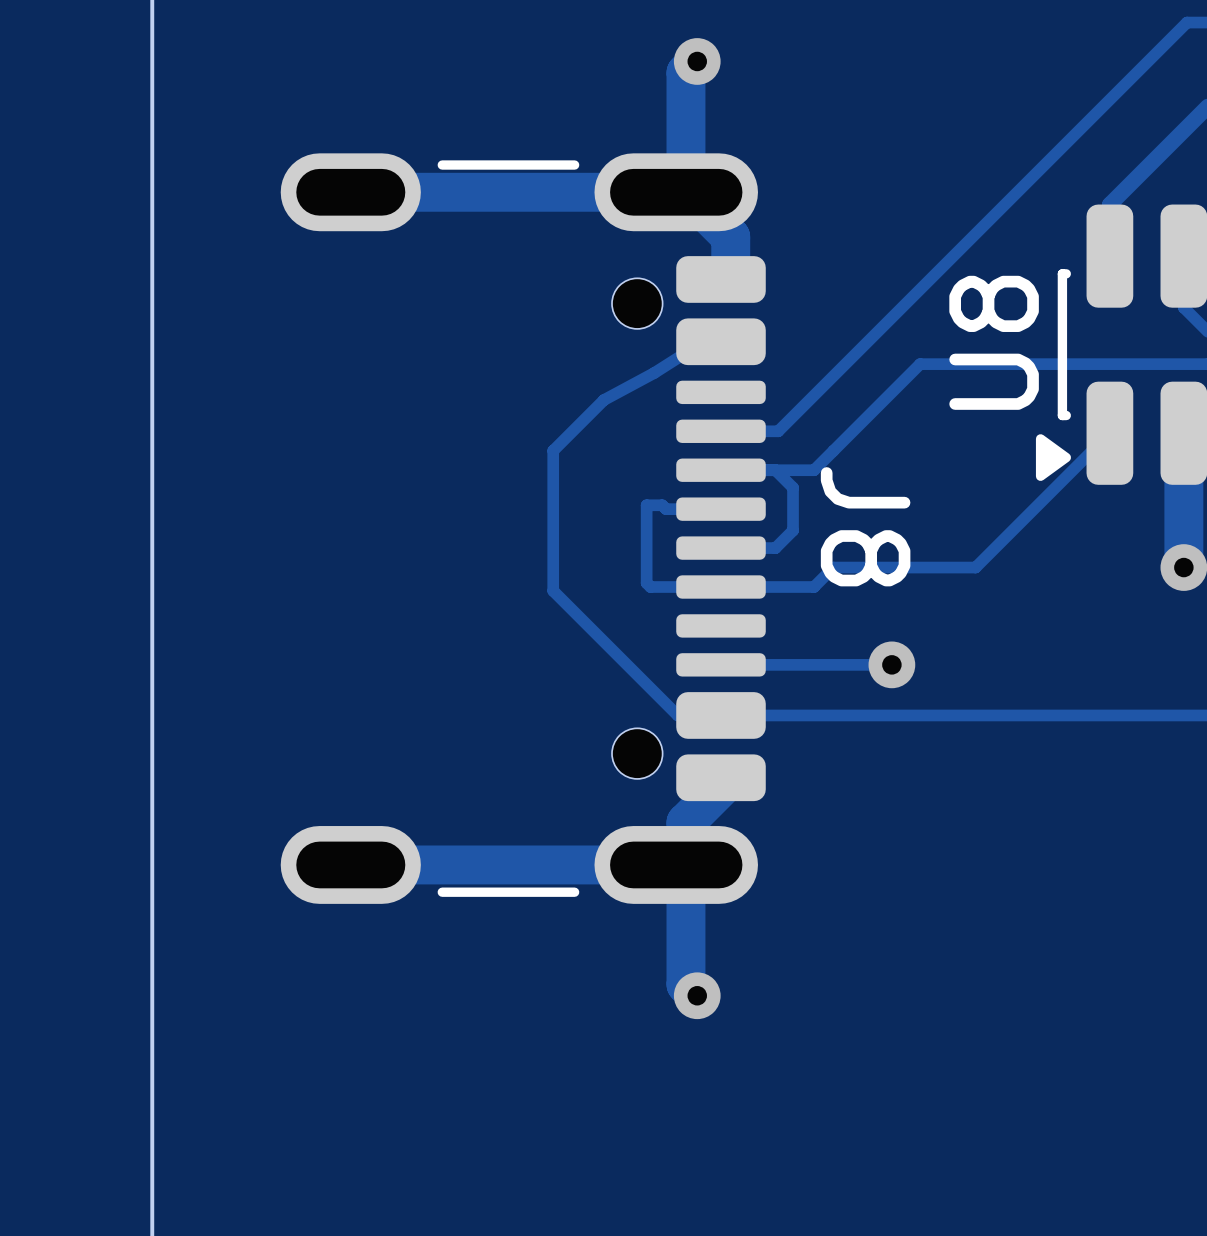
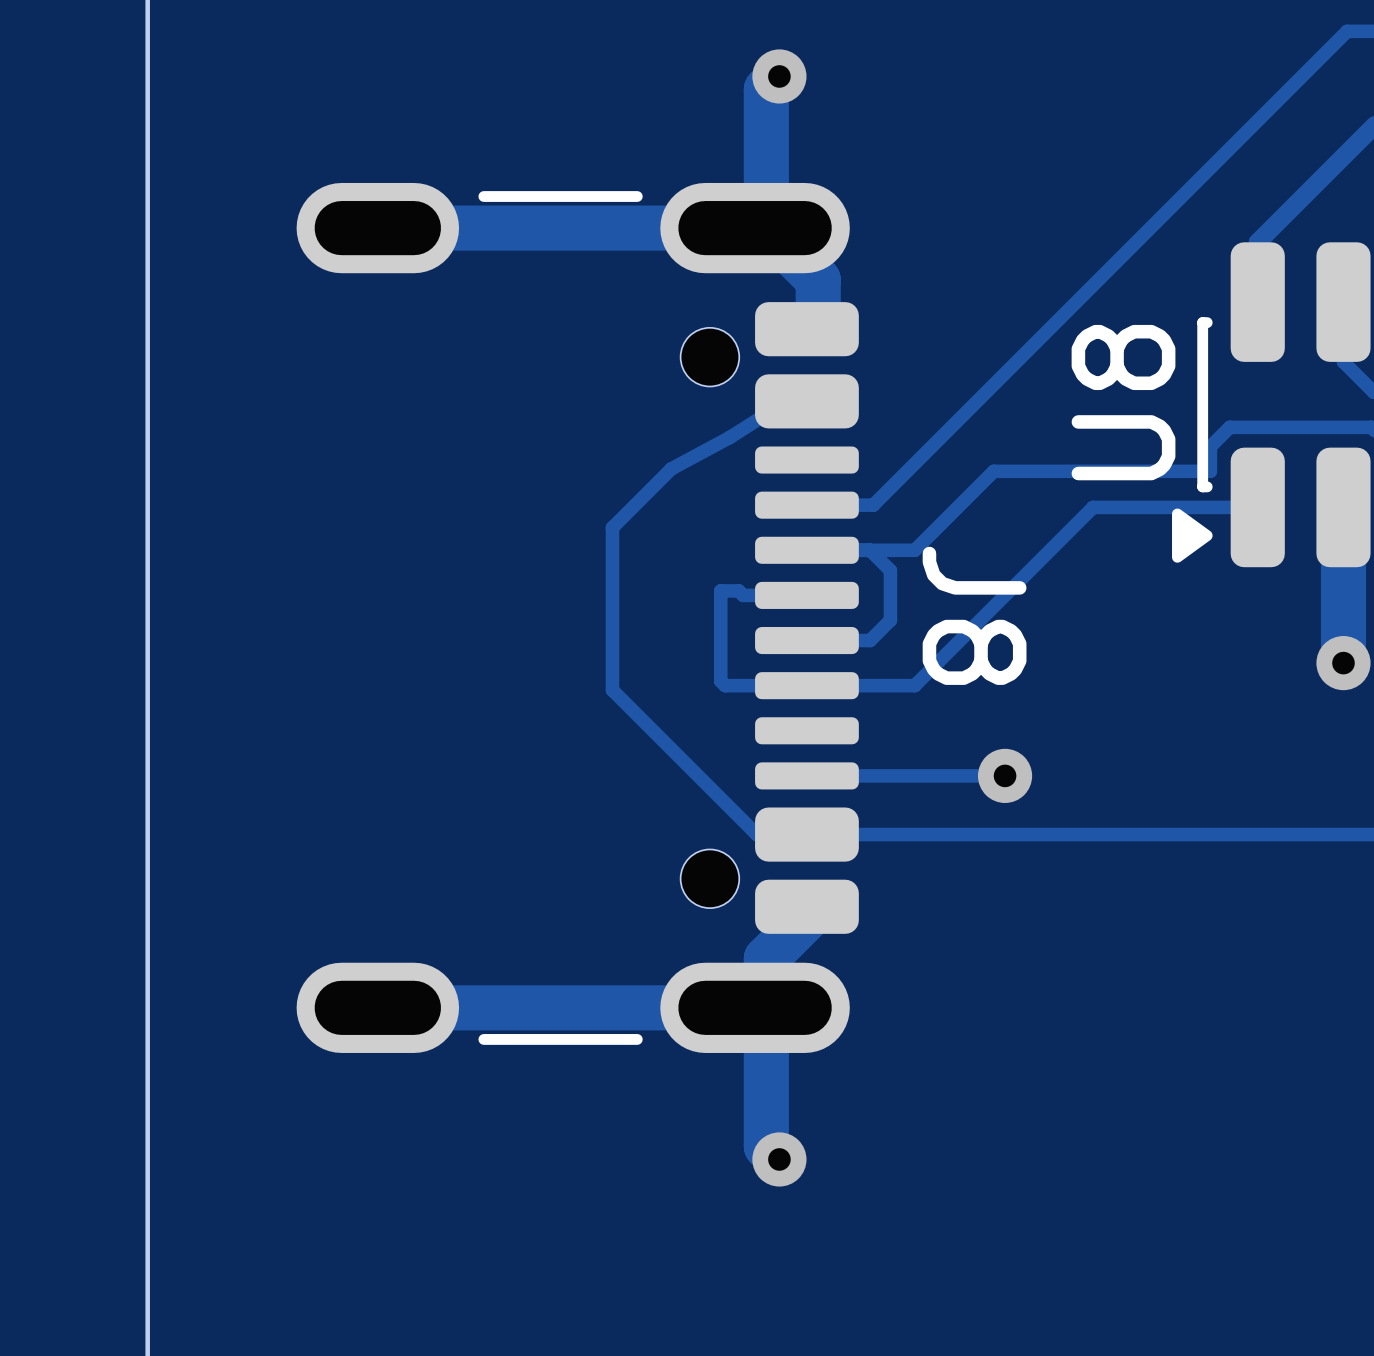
track: (1085, 364) (920, 364) (882, 402) -> (1229, 427) (1210, 446) (1210, 471) (993, 471)
track: (1109, 433) (975, 567) (833, 567) -> (1257, 507) (1093, 507) (937, 663)

